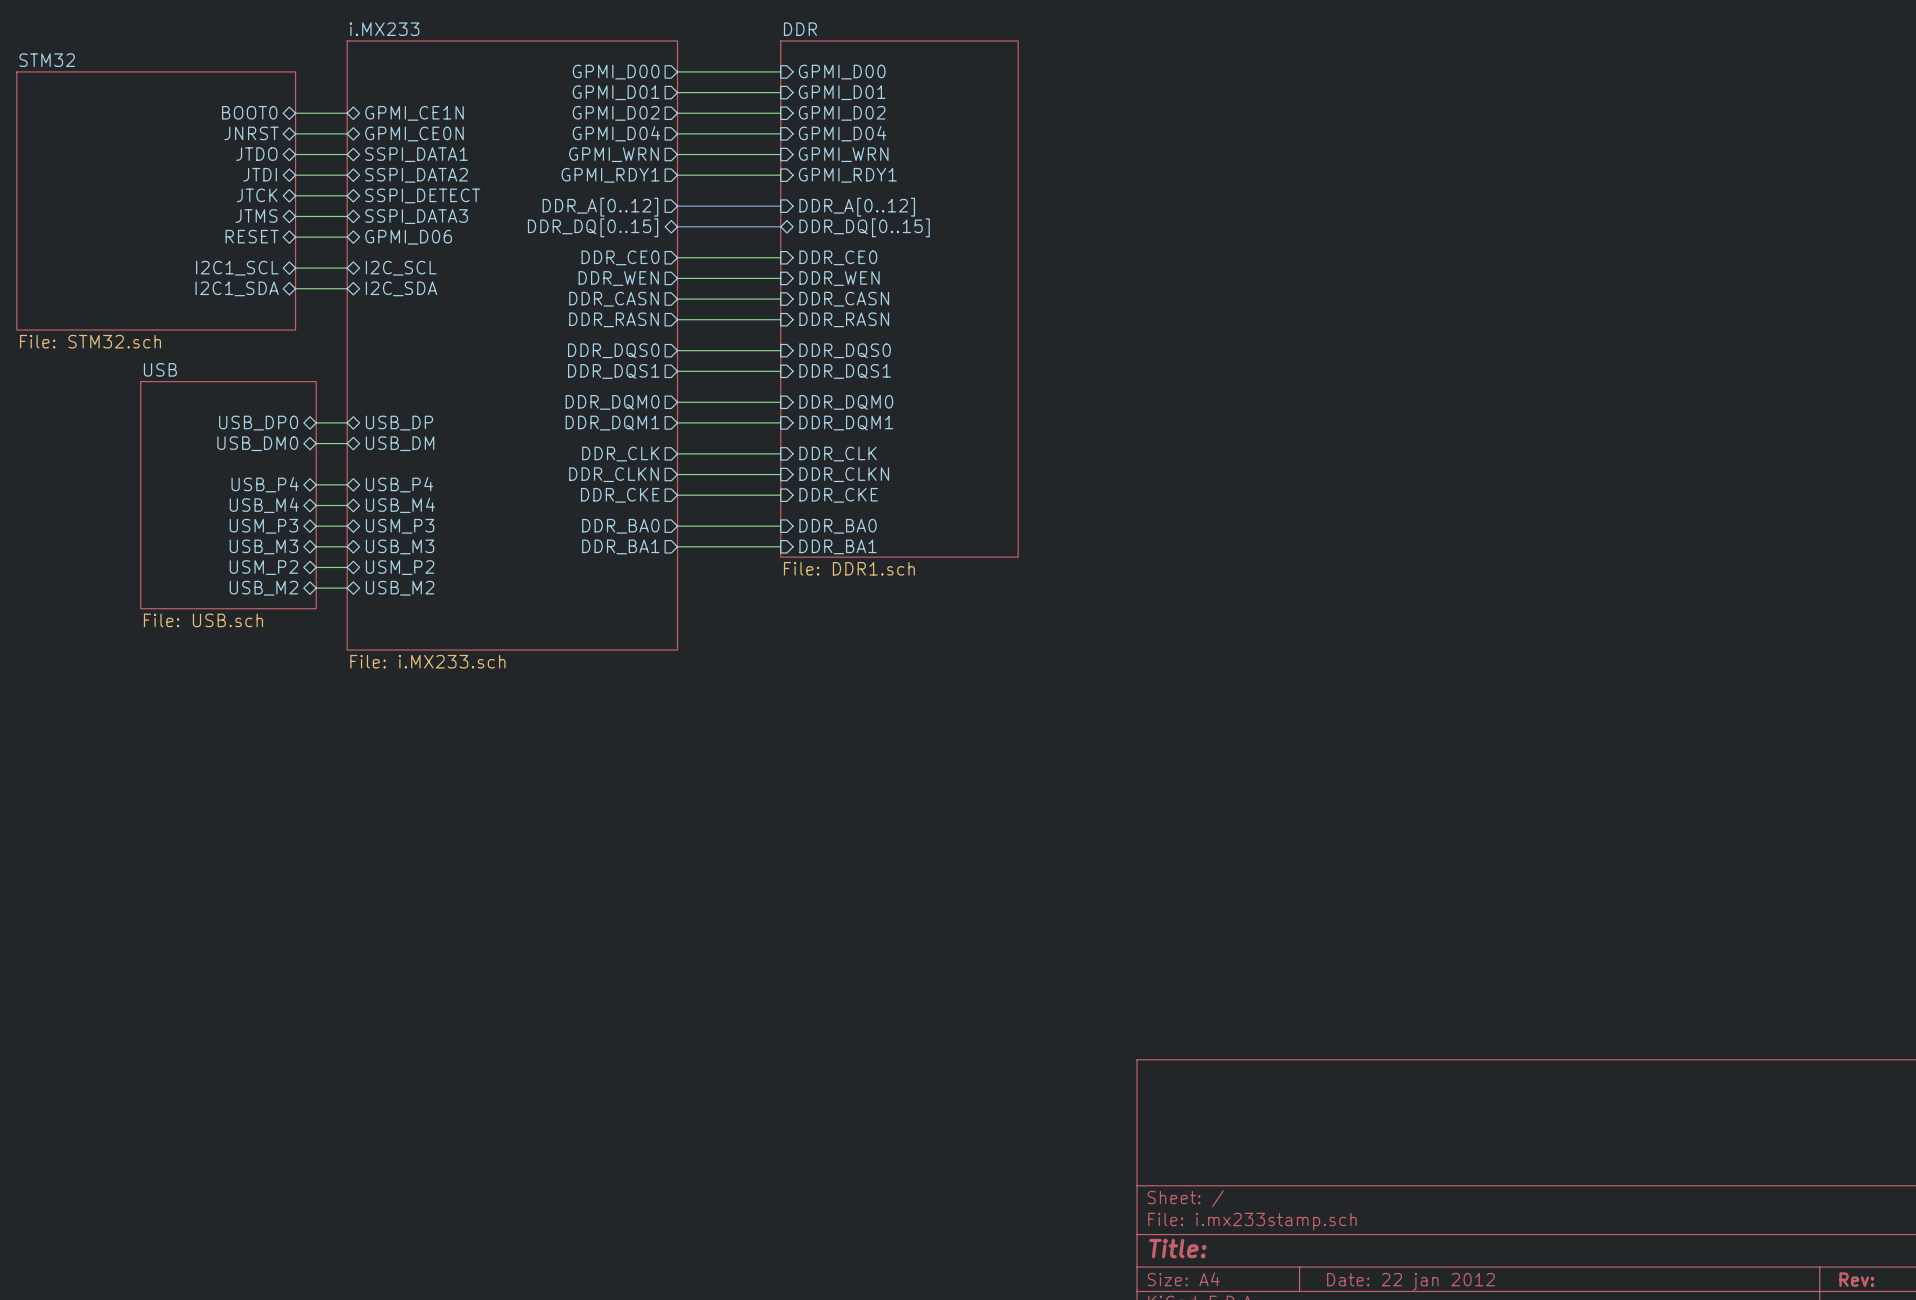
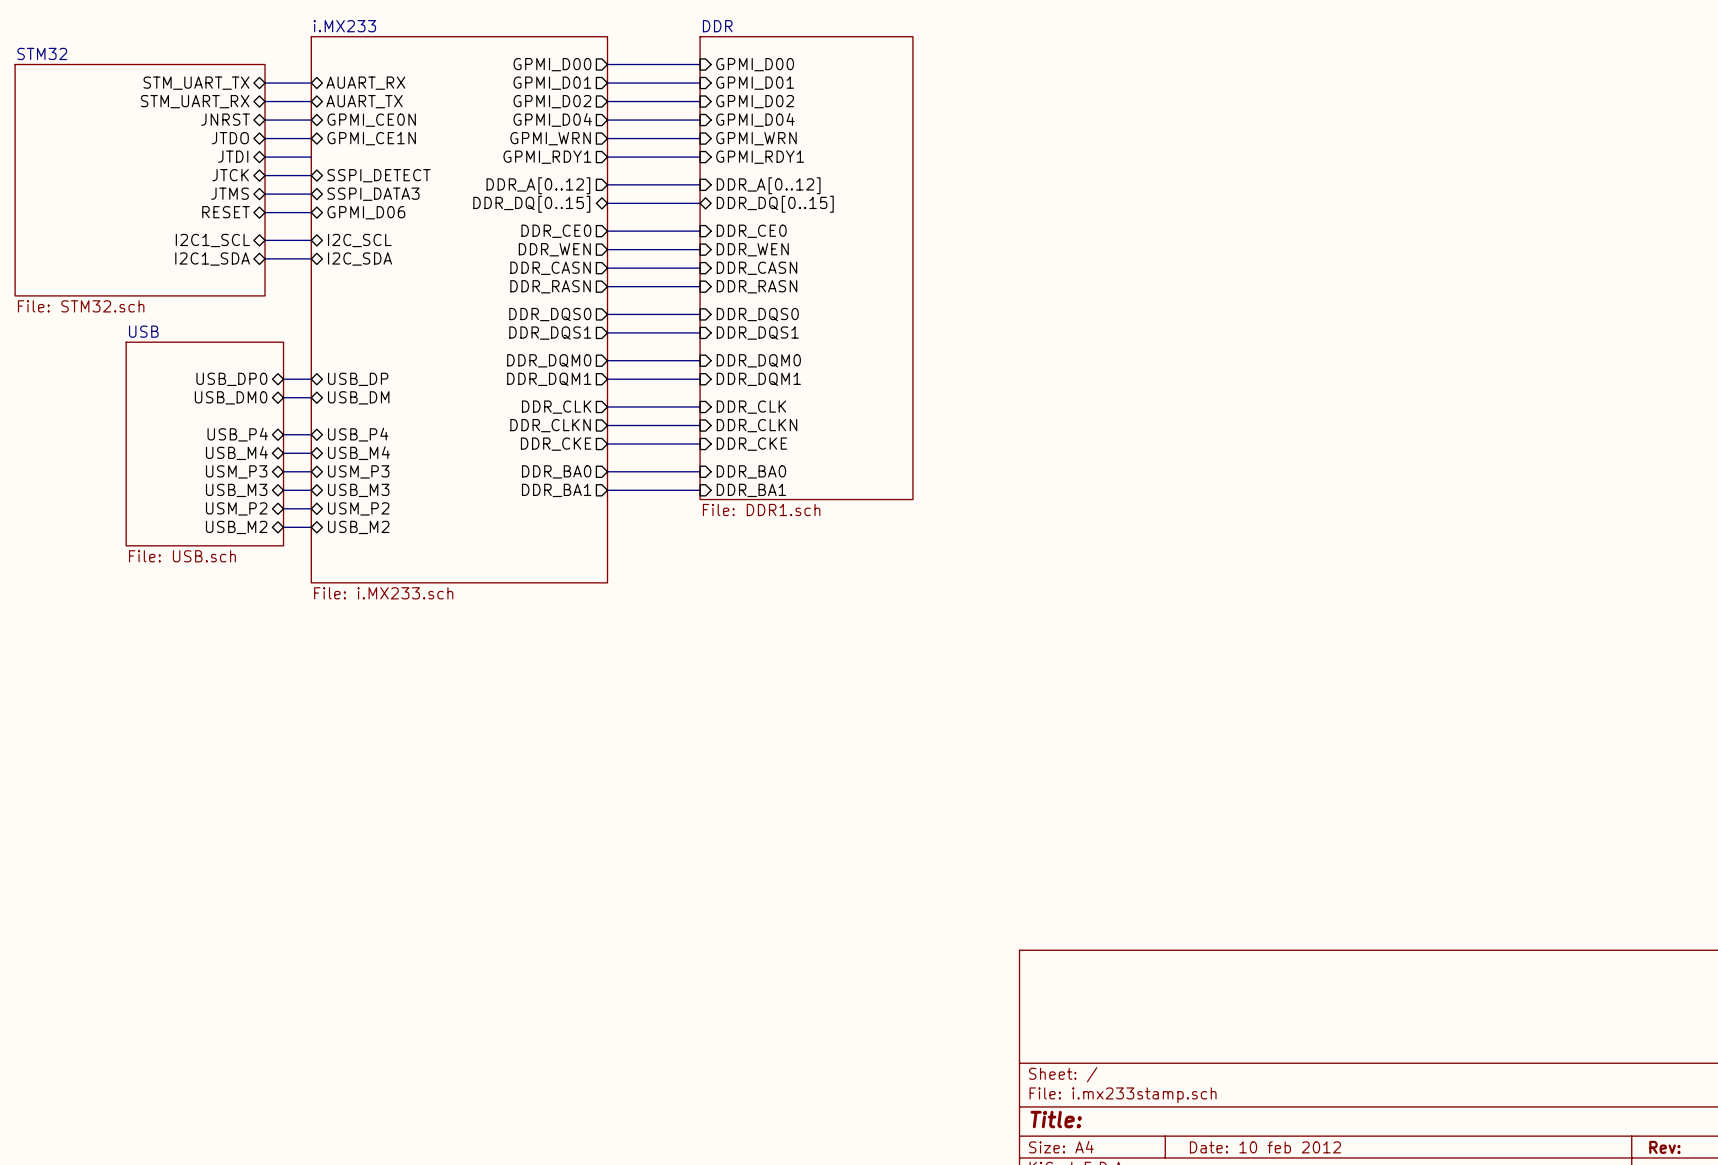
sheet pin: none -> STM_UART_TX (196, 83)
wire: none -> (265, 83) (311, 83)
sheet pin: none -> AUART_RX (365, 83)
sheet pin: BOOT0 (249, 112) -> STM_UART_RX (195, 101)
sheet pin: GPMI_CE1N (414, 113) -> AUART_TX (364, 101)
sheet pin: SSPI_DATA1 (416, 154) -> GPMI_CE1N (371, 138)
sheet pin: SSPI_DATA2 (416, 175) -> none
title block: Date: 22 jan 2012 (1410, 1281) -> Date: 10 feb 2012 (1265, 1147)

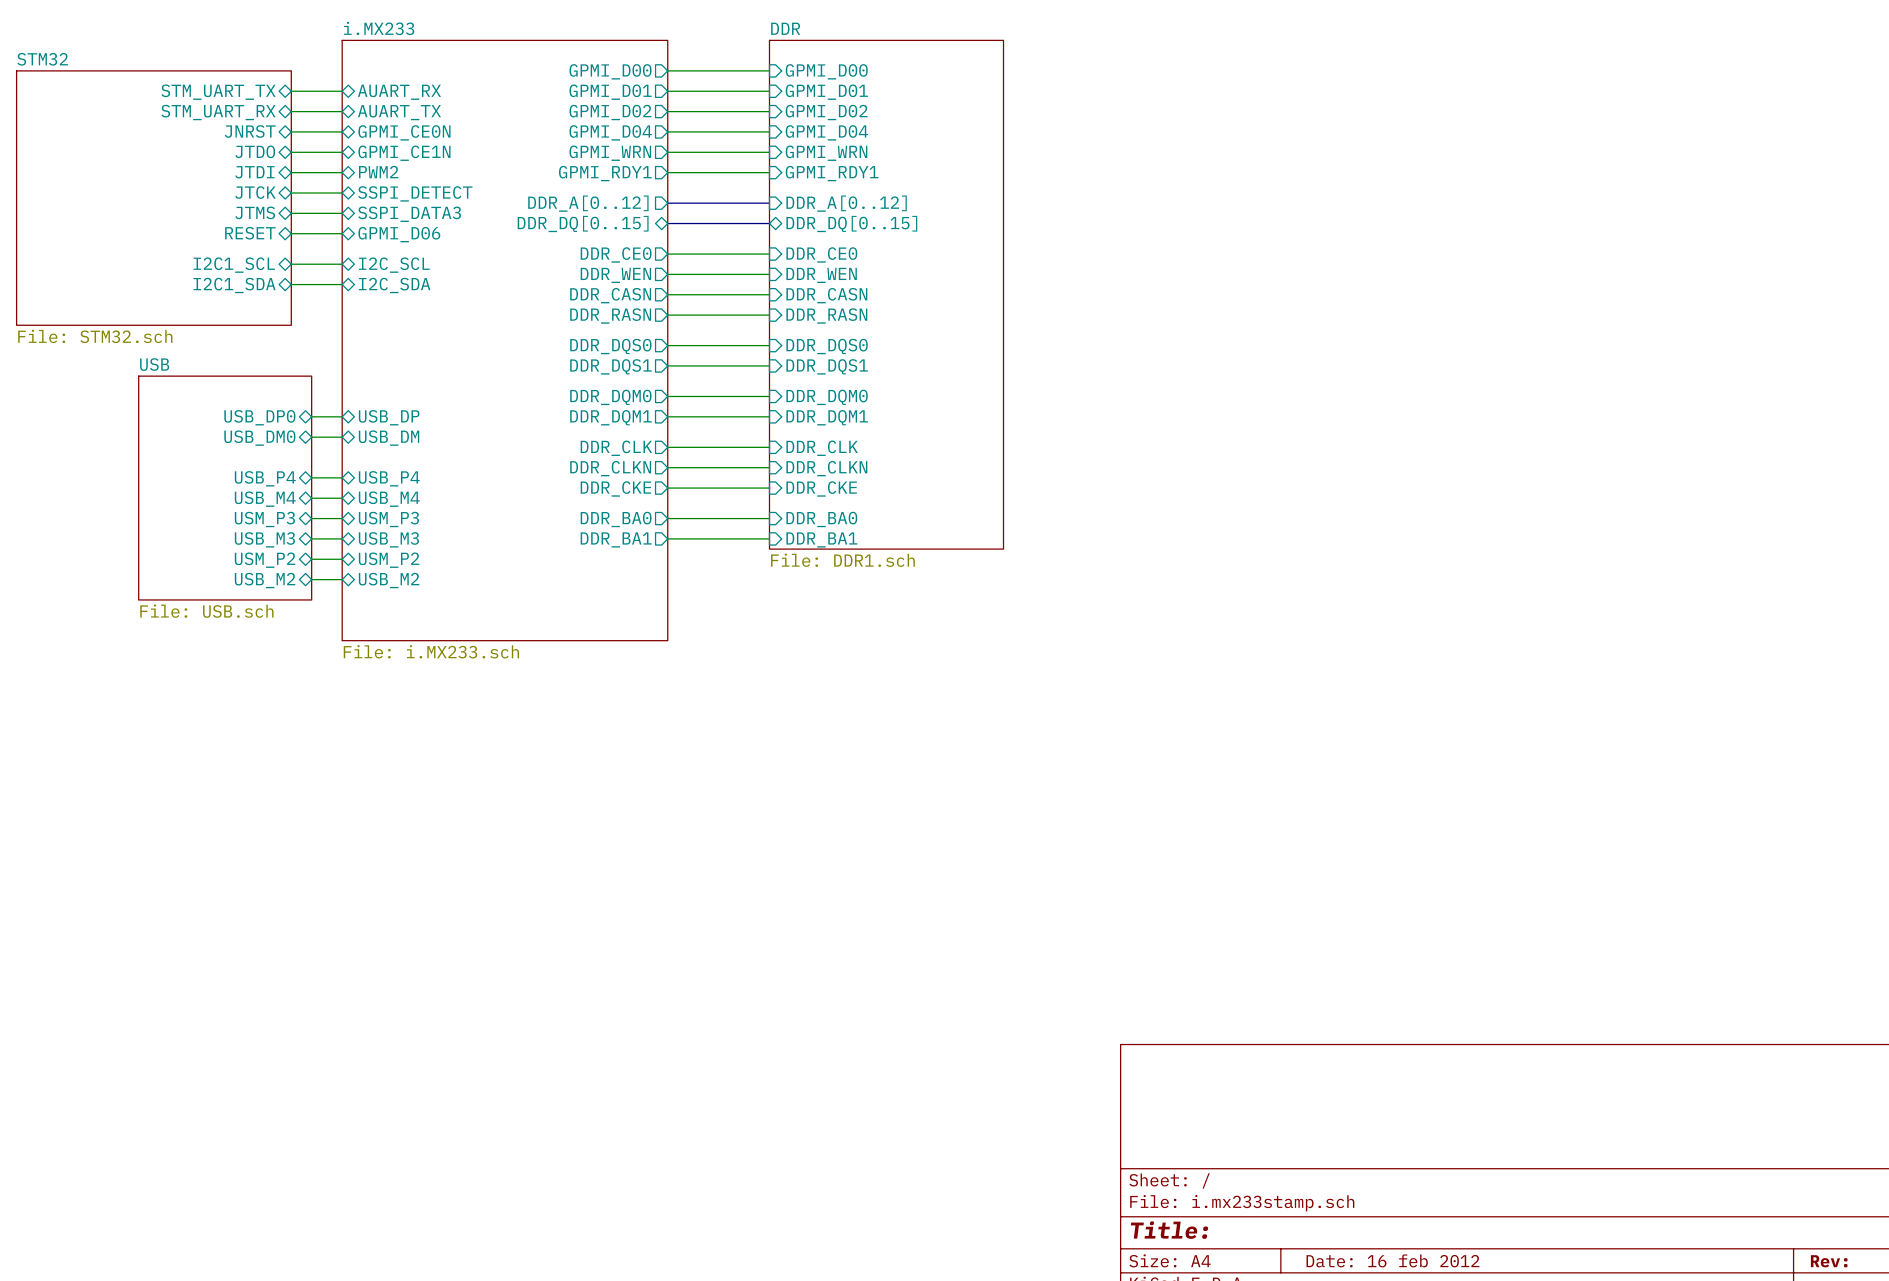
sheet pin: none -> PWM2 (378, 172)
title block: Date: 10 feb 2012 (1265, 1147) -> Date: 16 feb 2012 (1392, 1260)

